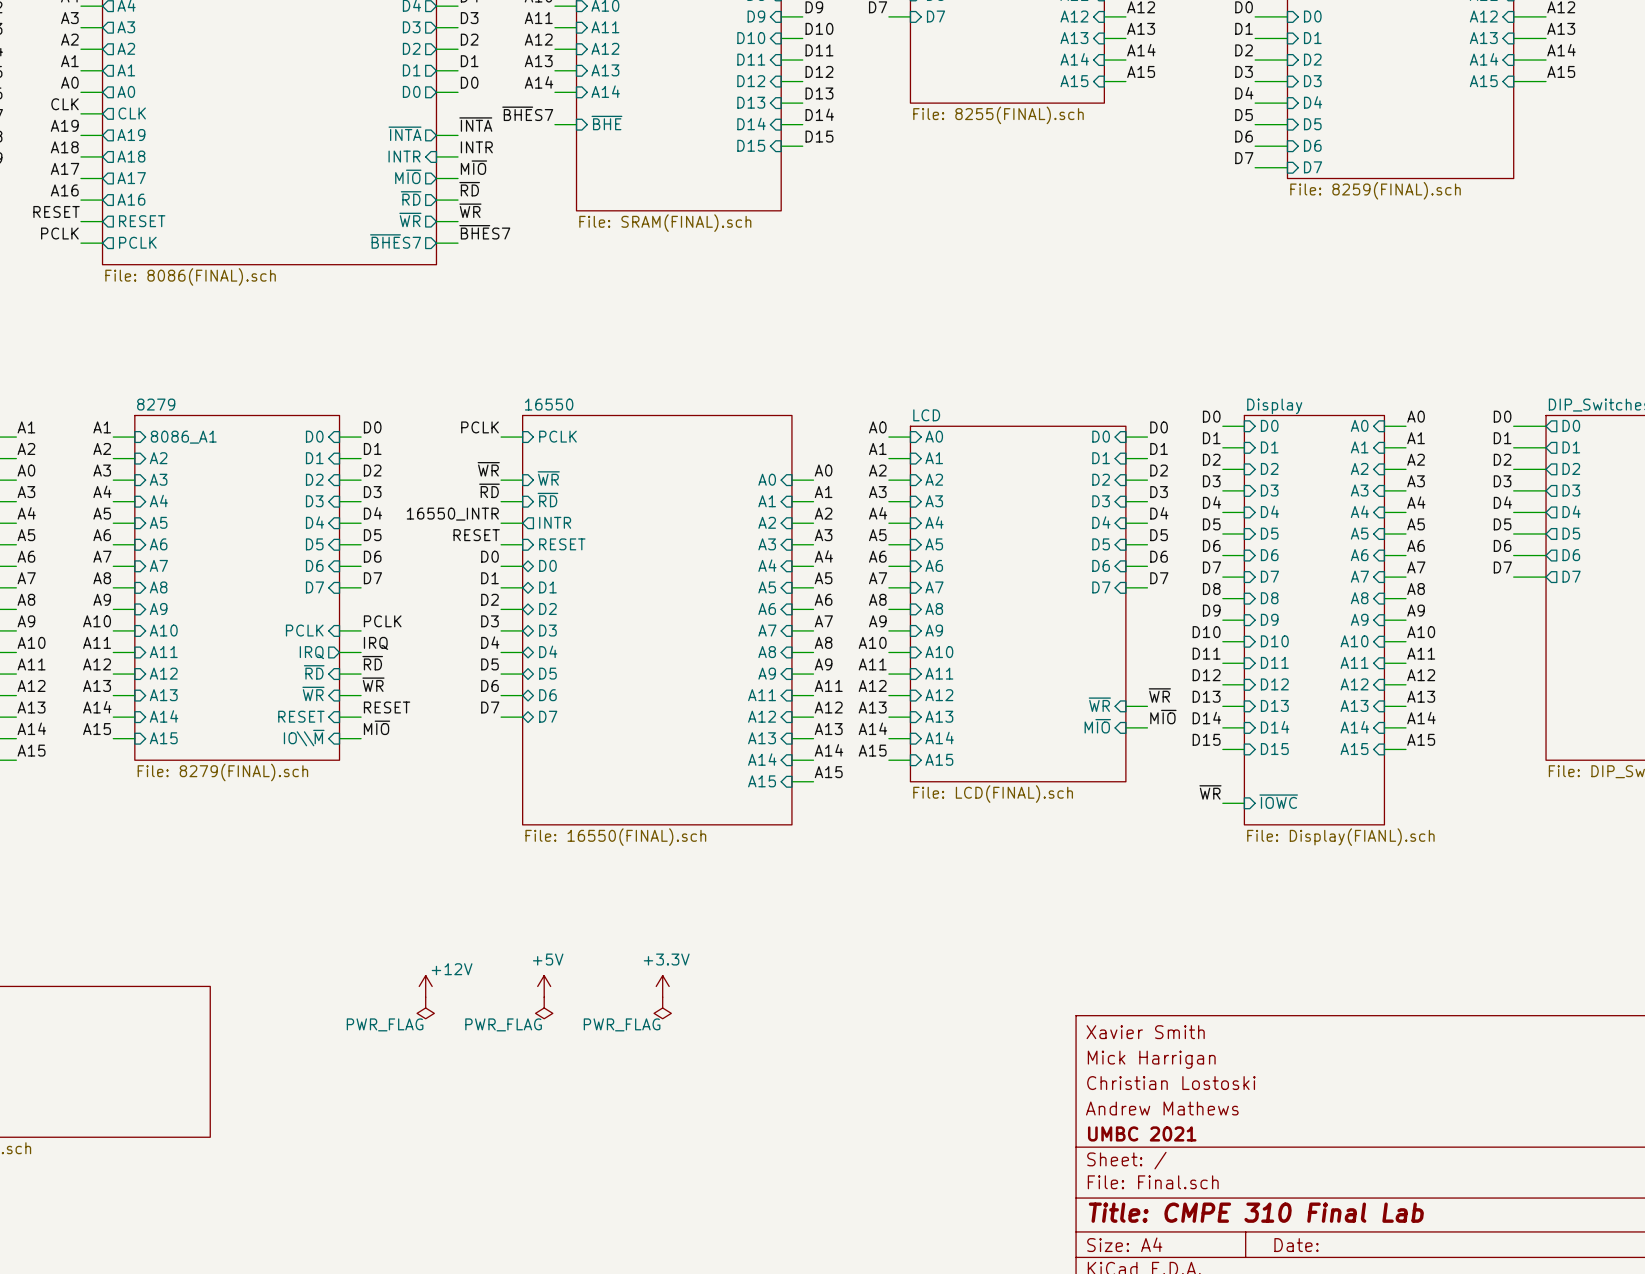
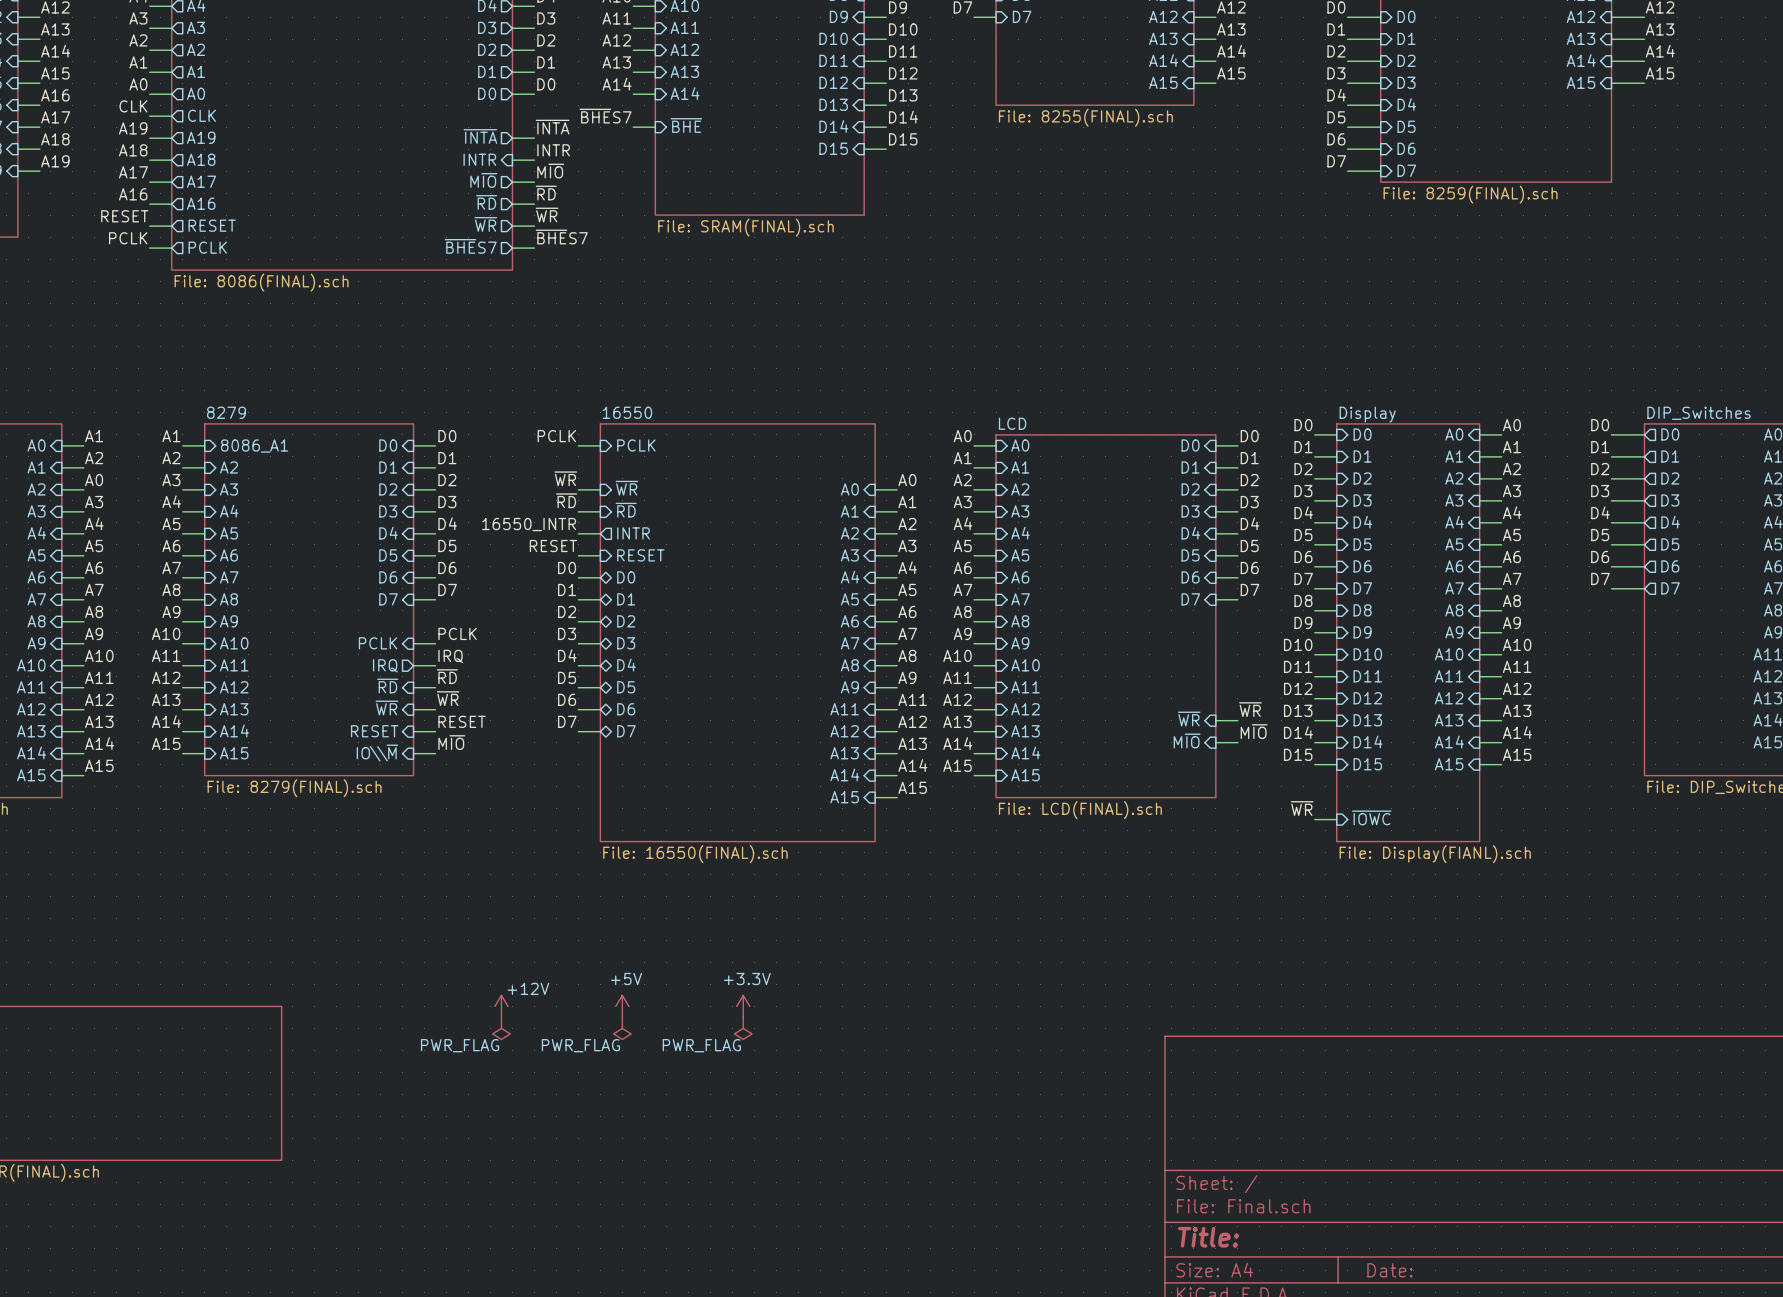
title block: Xavier Smith (1145, 1032) -> none
title block: Mick Harrigan (1151, 1059) -> none
title block: Christian Lostoski (1171, 1083) -> none
title block: Andrew Mathews (1162, 1108) -> none
title block: UMBC 2021 (1142, 1133) -> none
title block: Title: CMPE 310 Final Lab (1256, 1212) -> Title: (1208, 1237)

